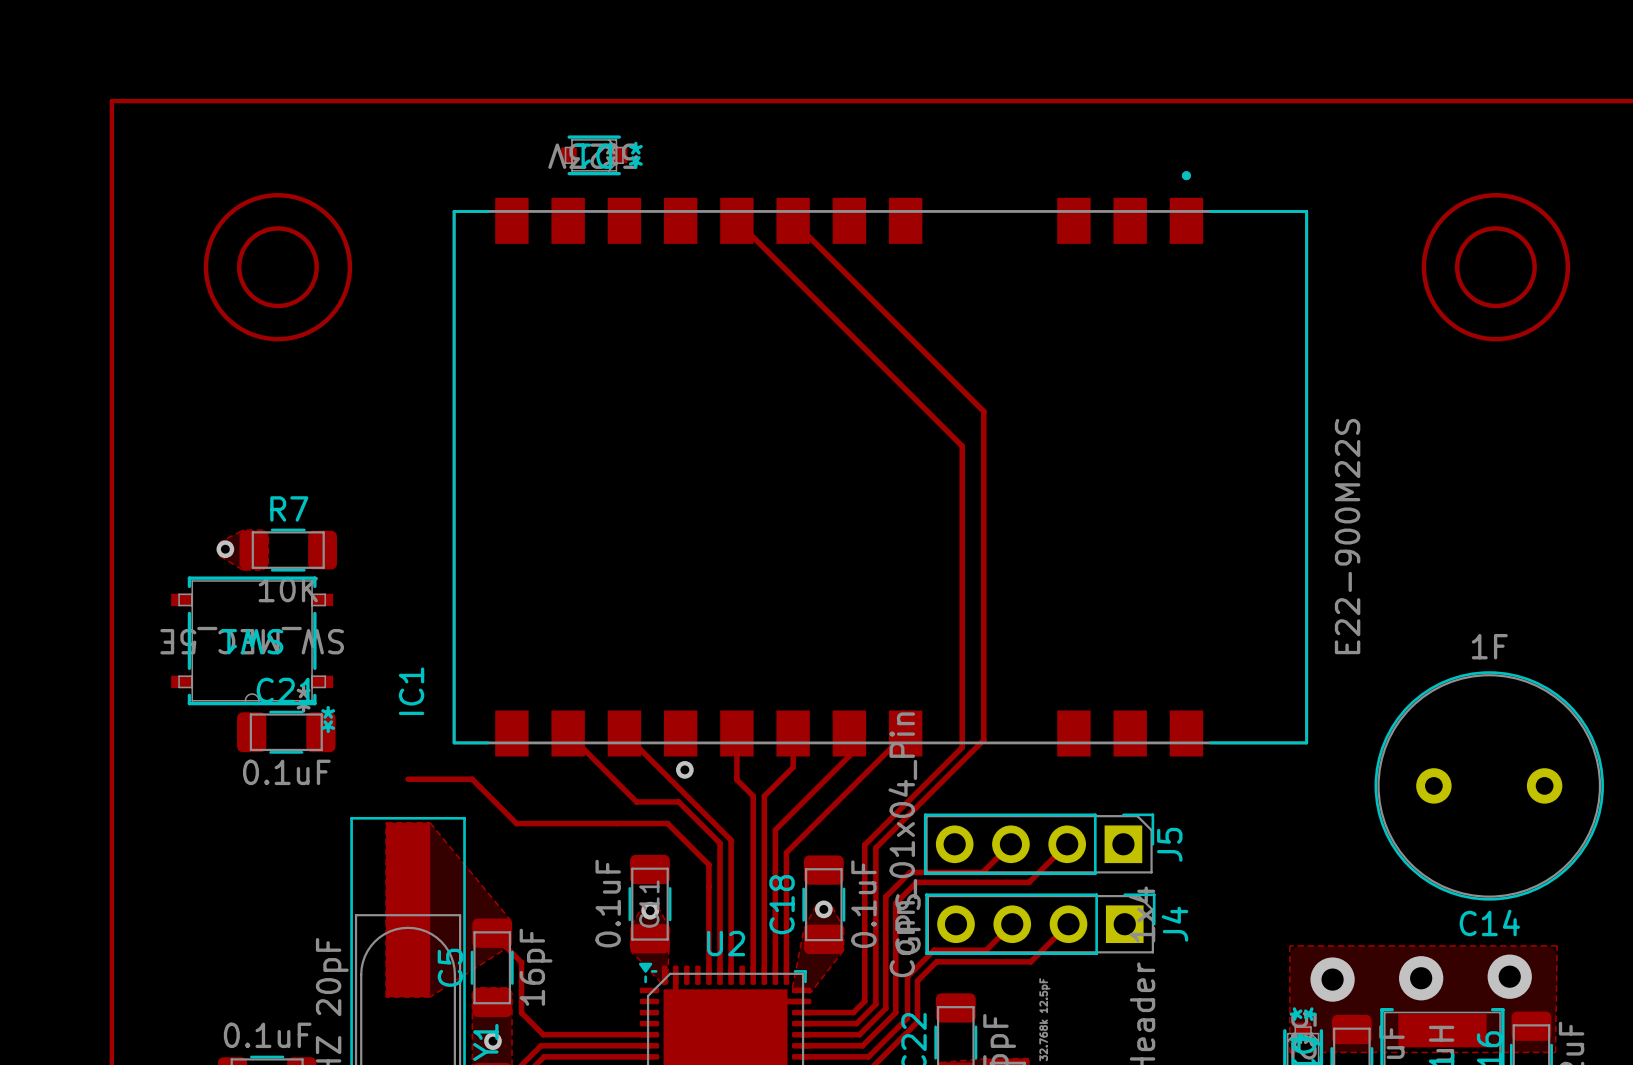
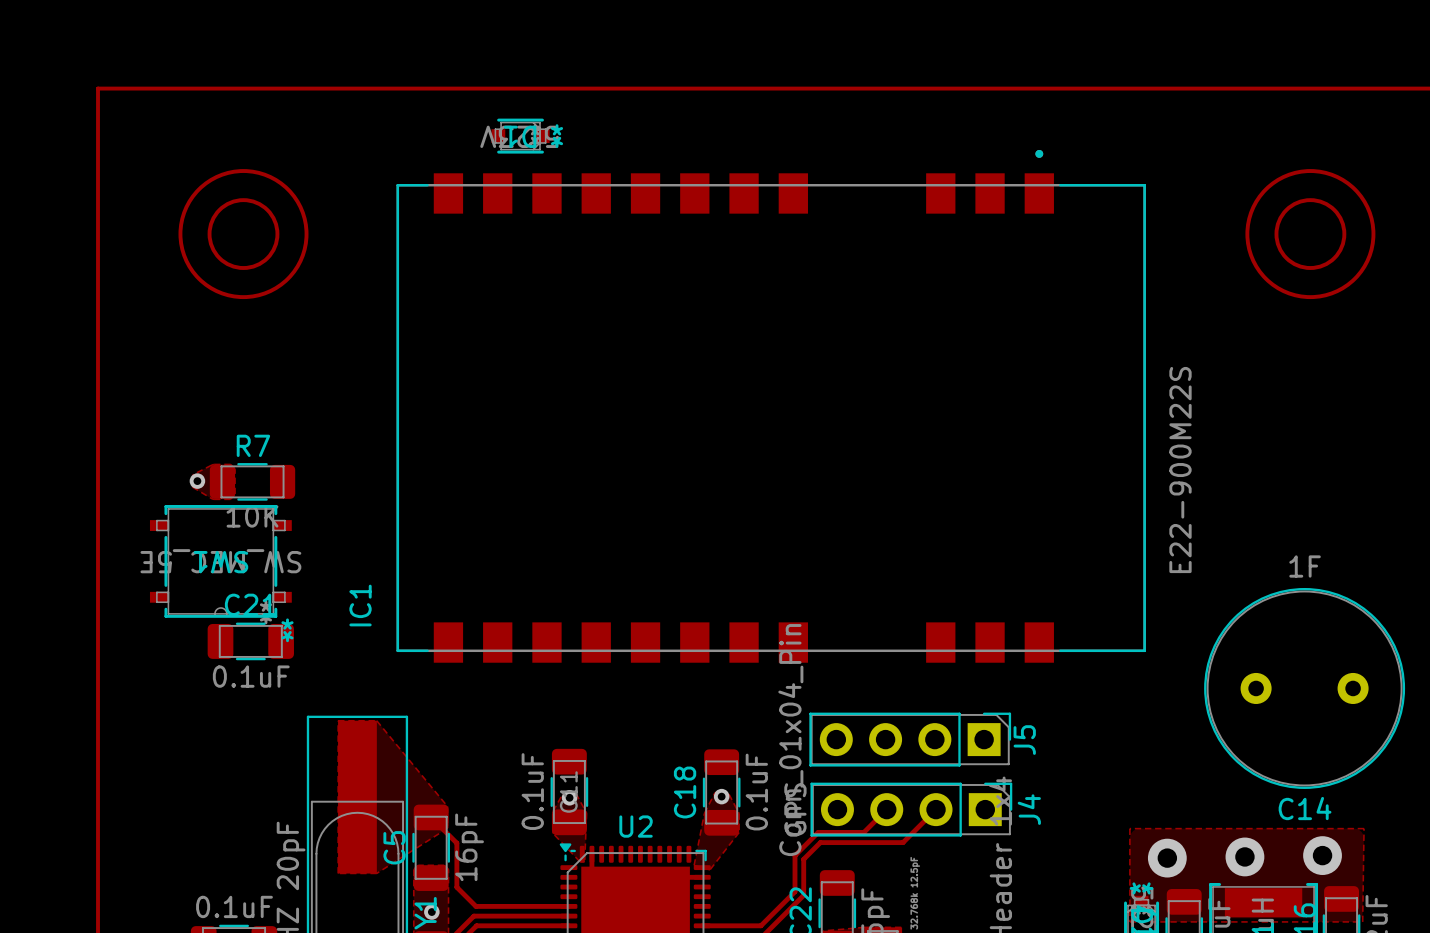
top track: (736, 220) (962, 446) (962, 747) (864, 844) (864, 1001) (853, 1012) (801, 1012) -> none
top track: (793, 220) (983, 411) (983, 739) (875, 847) (875, 1004) (856, 1023) (801, 1023) -> none
top track: (568, 733) (636, 801) (678, 801) (720, 843) (720, 975) -> none
top track: (624, 733) (731, 840) (731, 975) -> none
top track: (736, 733) (736, 779) (753, 796) (753, 975) -> none
top track: (793, 733) (793, 767) (764, 796) (764, 975) -> none
top track: (849, 733) (849, 755) (775, 829) (775, 975) -> none
top track: (905, 733) (786, 852) (786, 975) -> none
via: (684, 769) -> none
top track: (408, 779) (472, 779) (516, 823) (667, 823) (708, 864) (708, 975) -> none
top track: (1010, 844) (982, 872) (910, 872) (885, 896) (885, 1008) (859, 1034) (801, 1034) -> none
top track: (1067, 844) (1029, 882) (916, 882) (895, 903) (895, 1012) (862, 1045) (801, 1045) -> none

